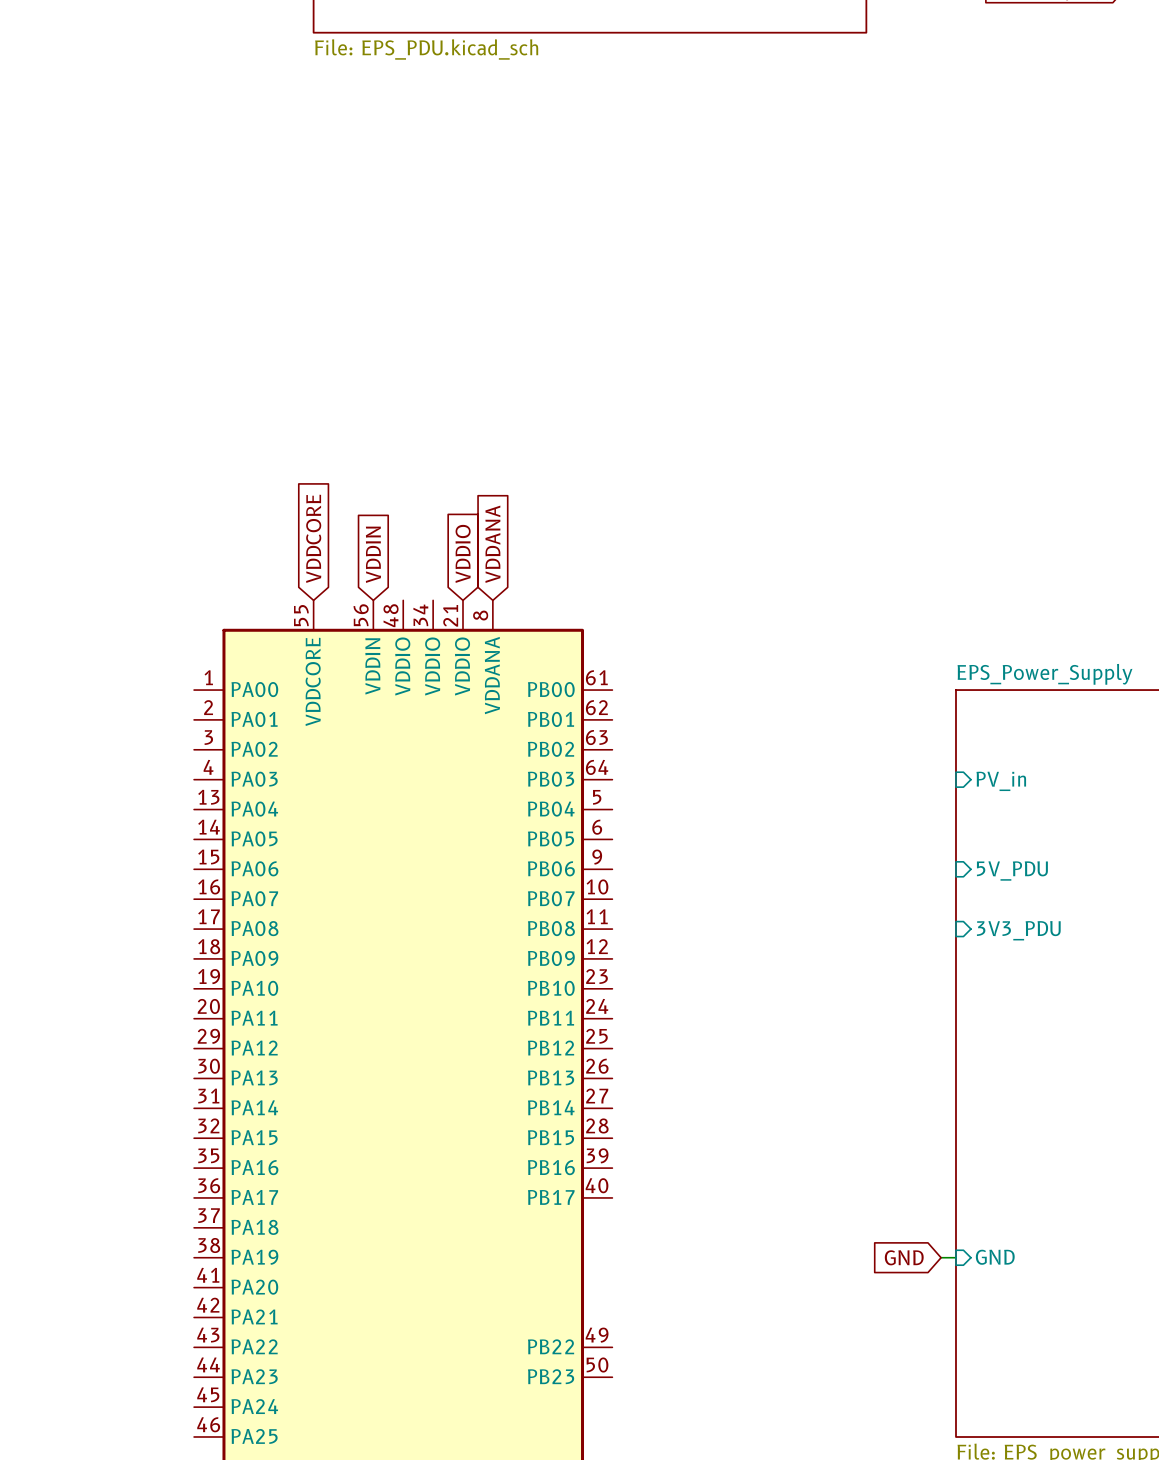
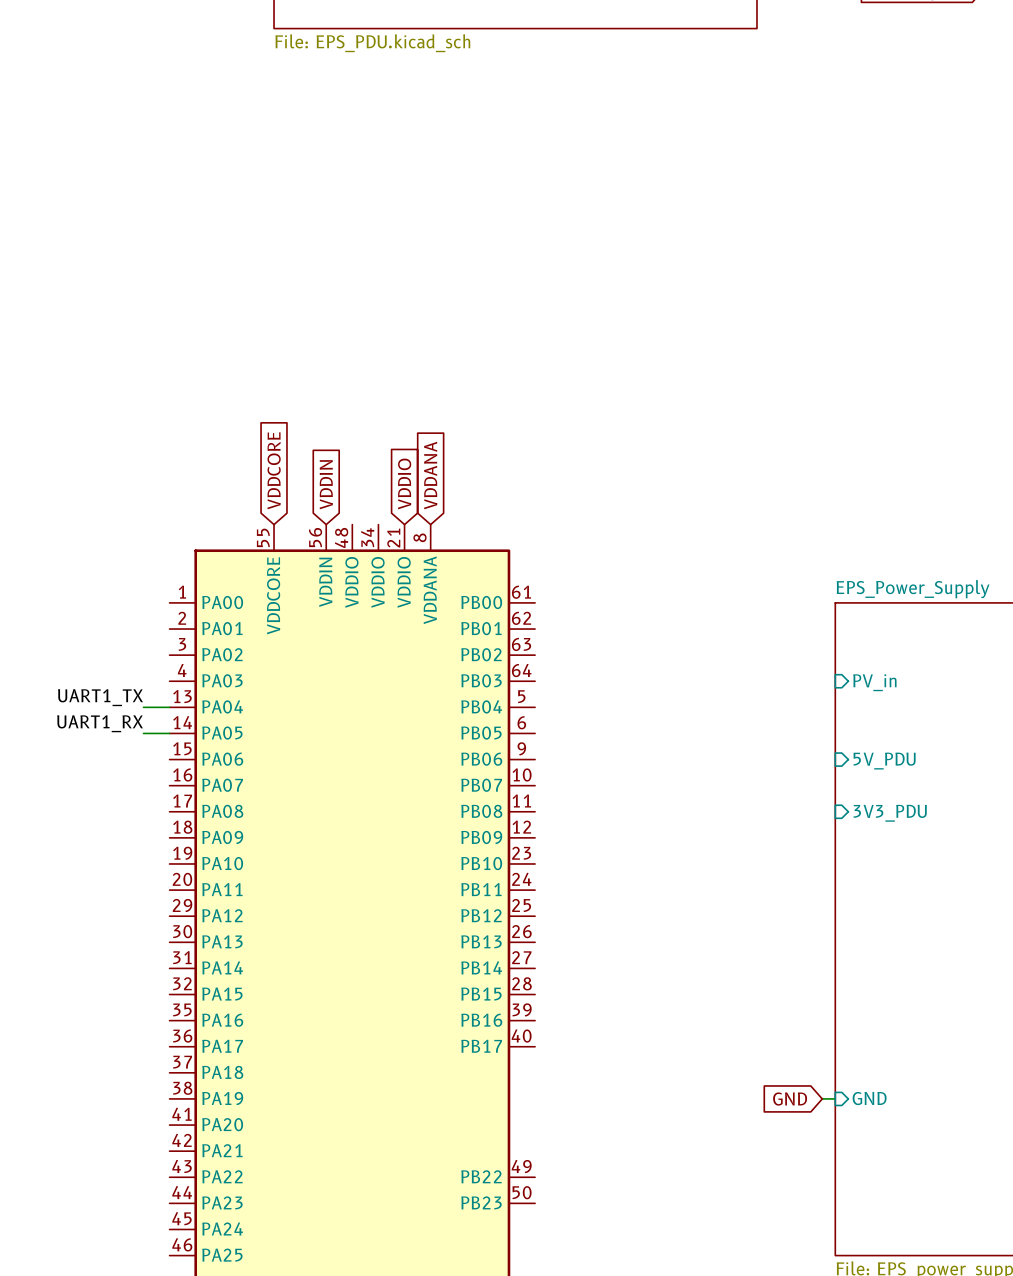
label: none -> UART1_TX (100, 697)
wire: none -> (143, 707) (169, 707)
label: none -> UART1_RX (100, 723)
wire: none -> (143, 733) (169, 733)

